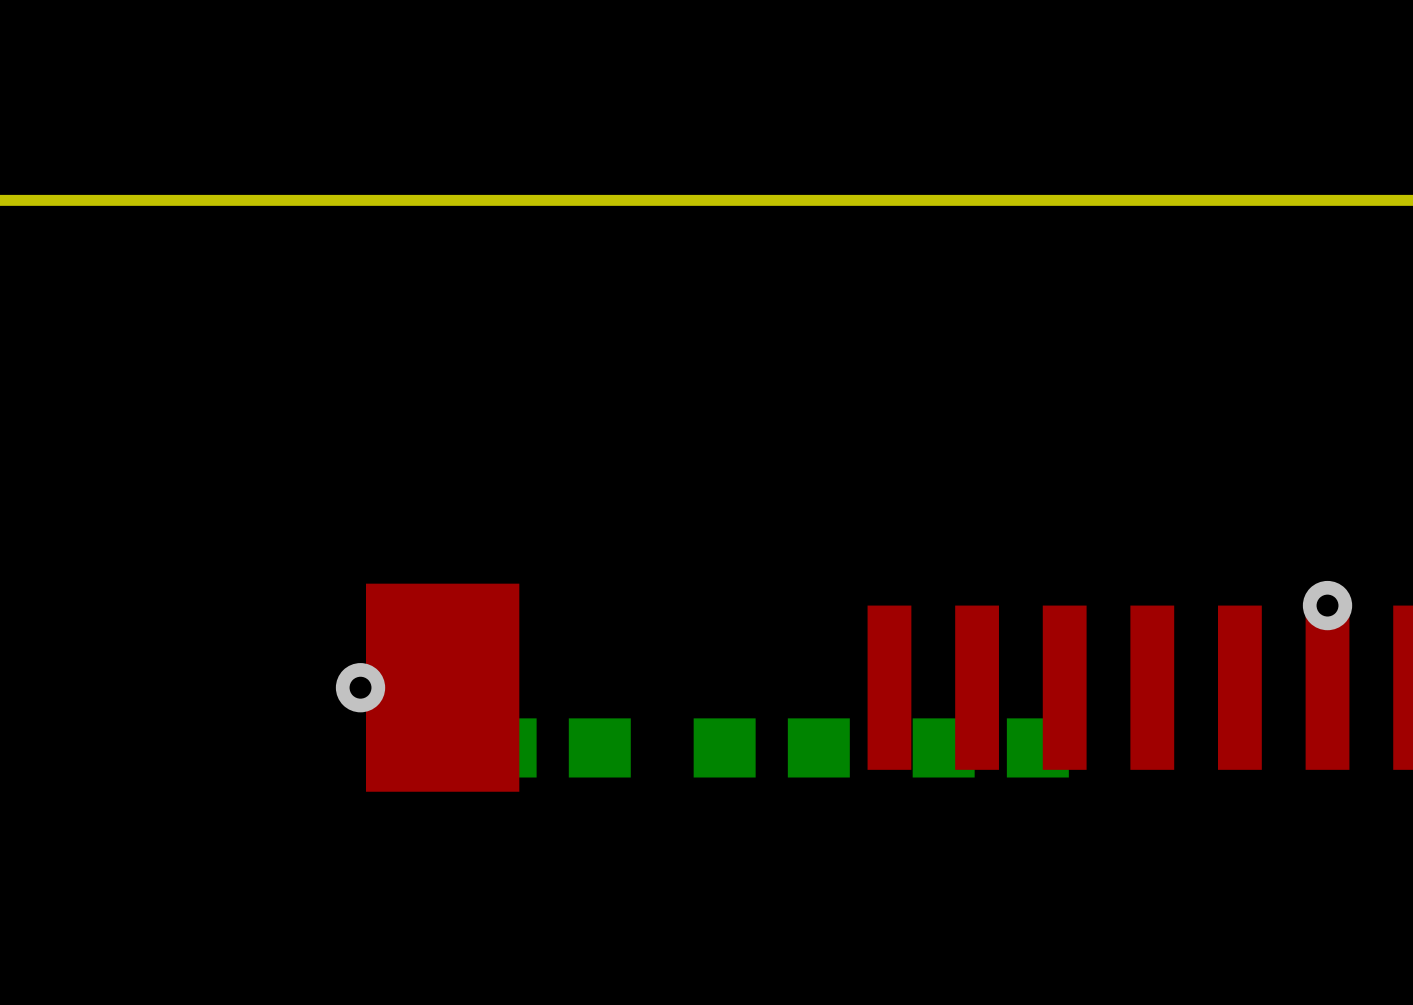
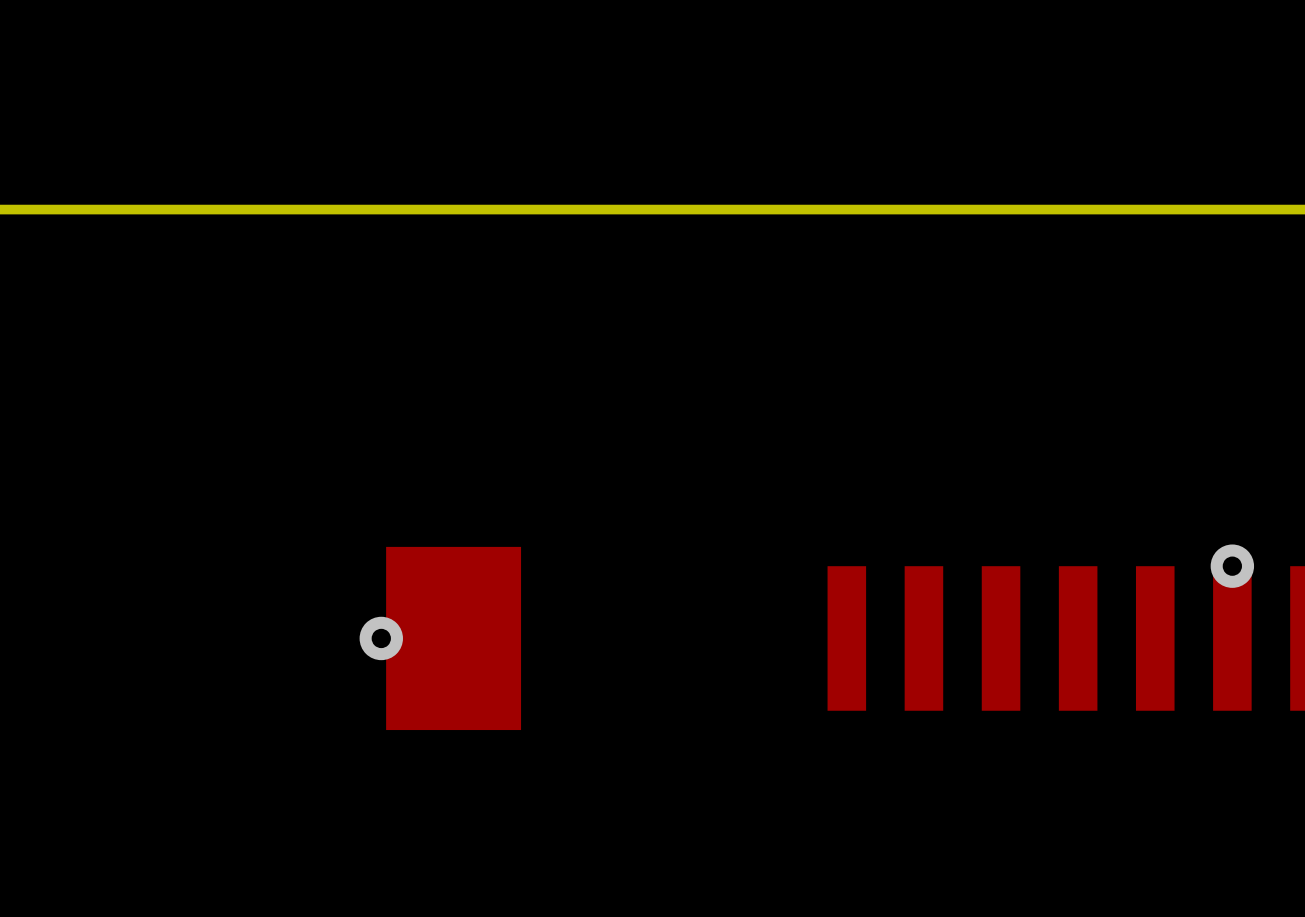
part: (552, 747) -> none
part: (771, 747) -> none
part: (990, 747) -> none

